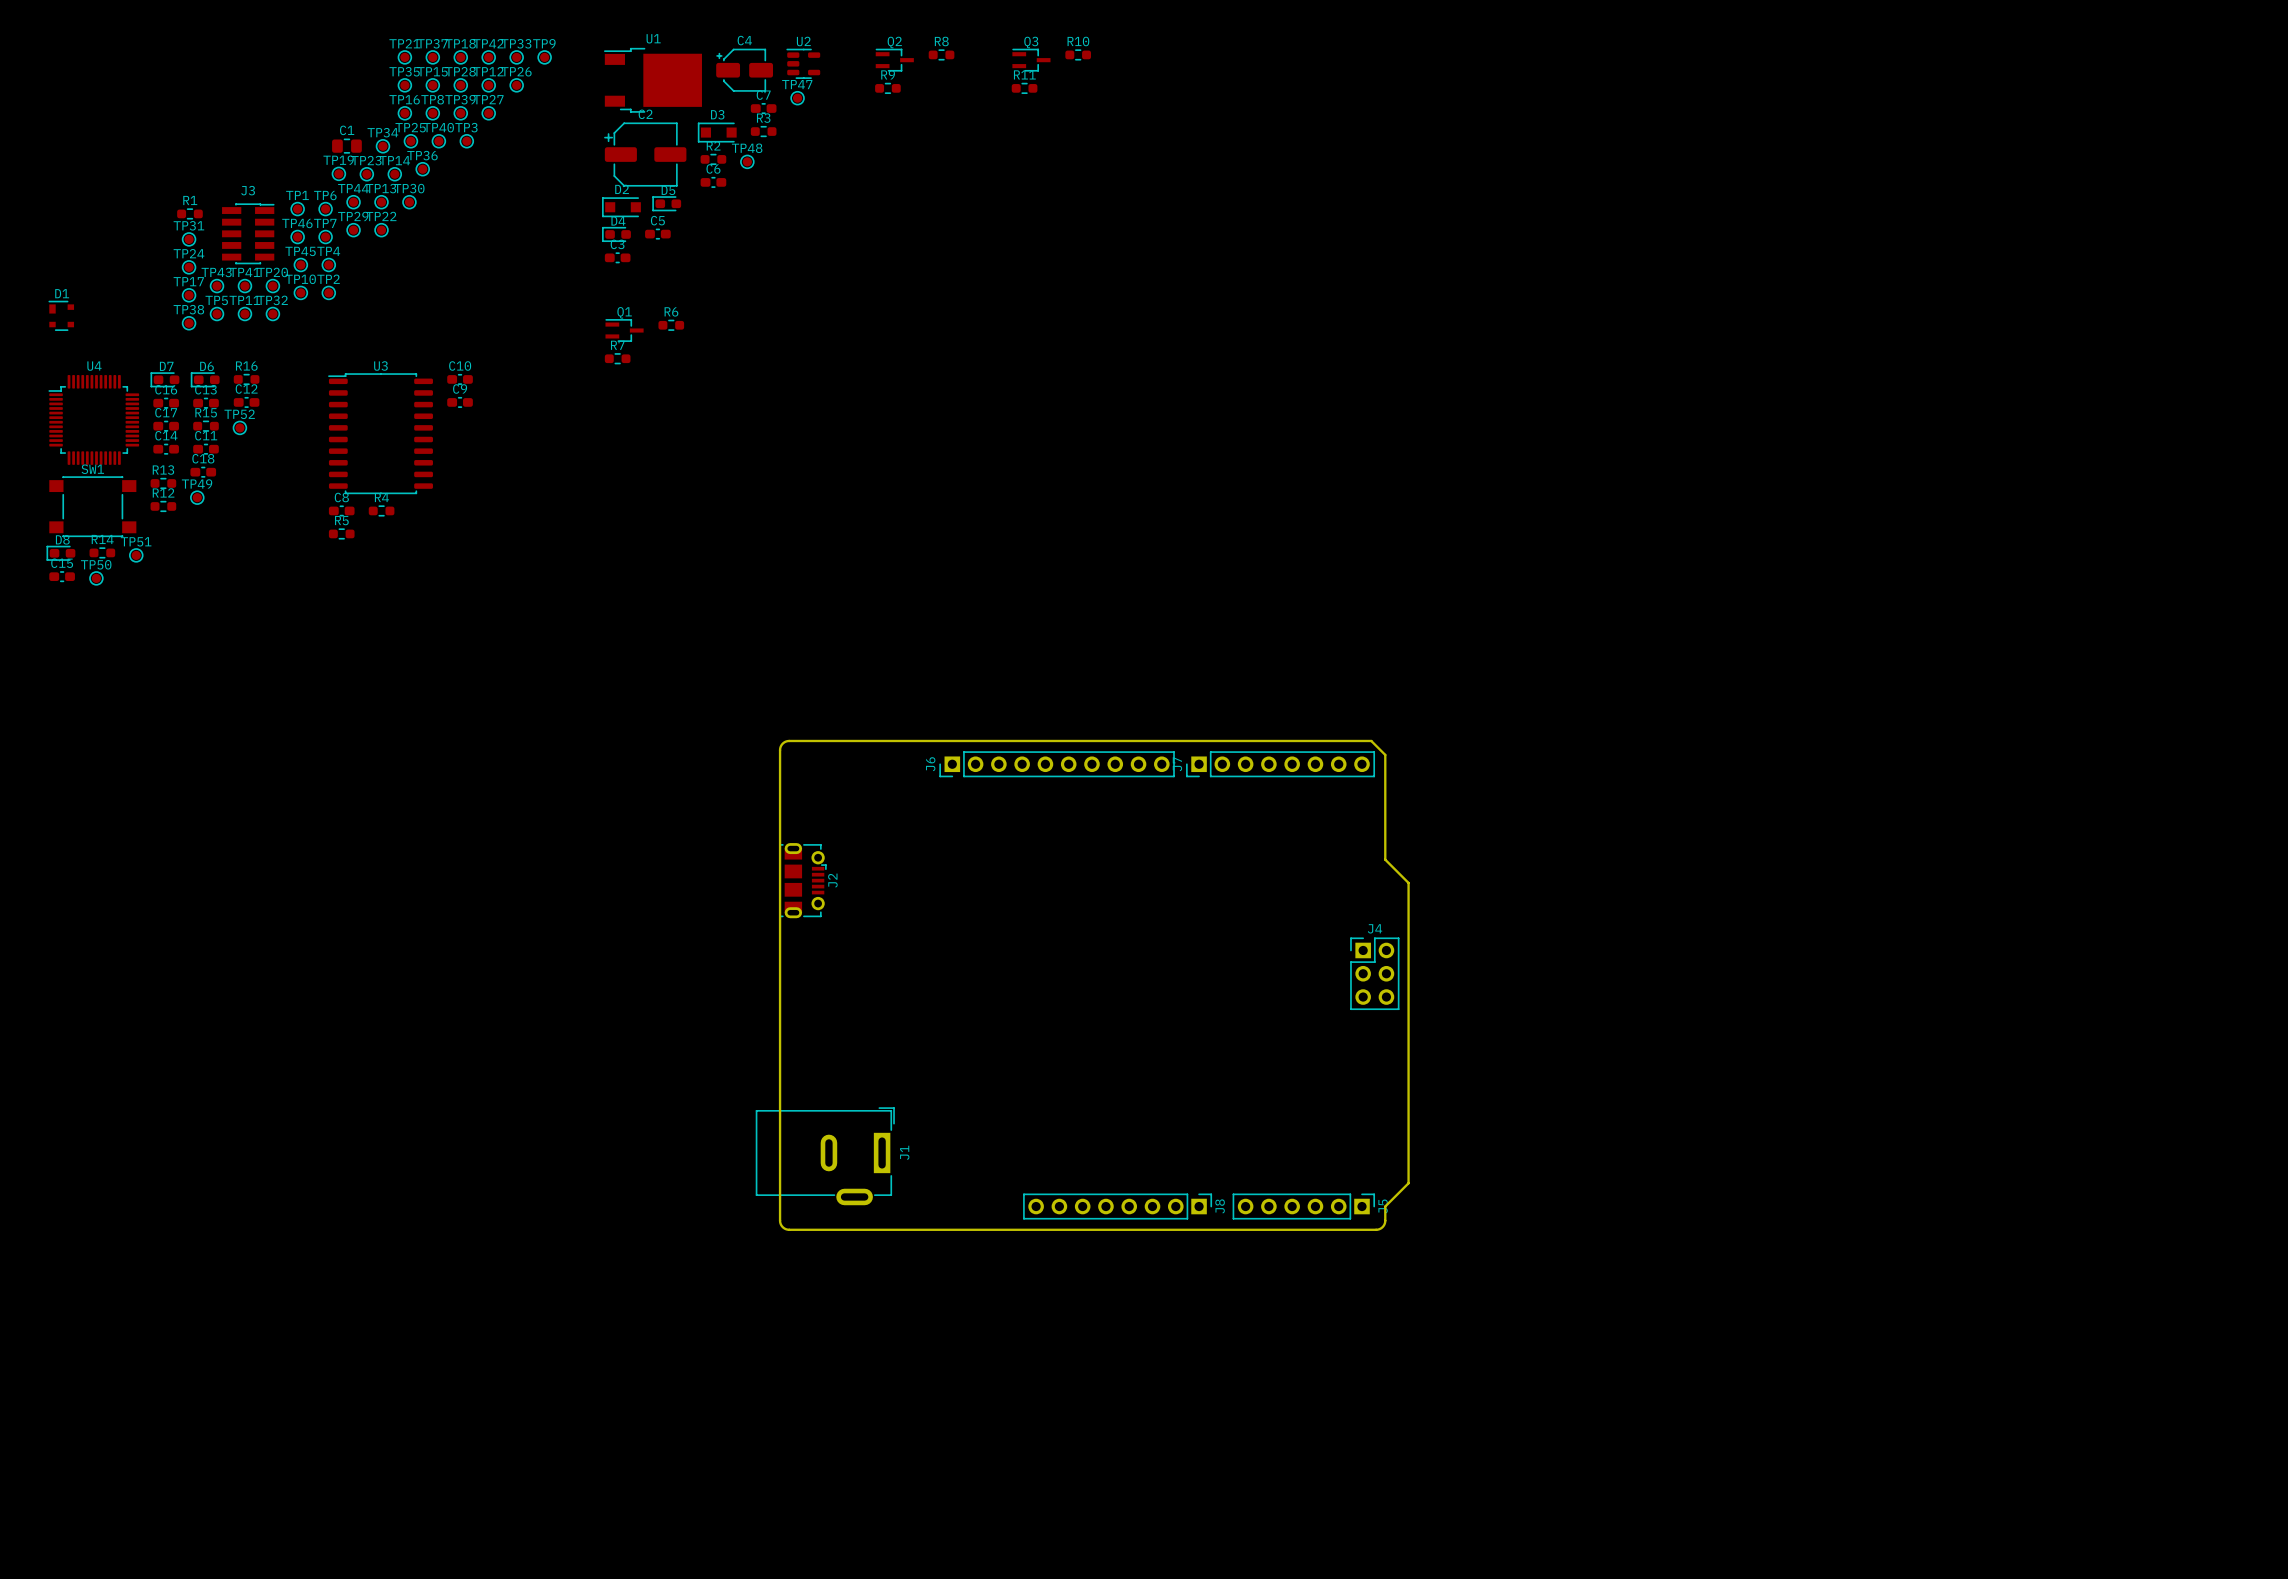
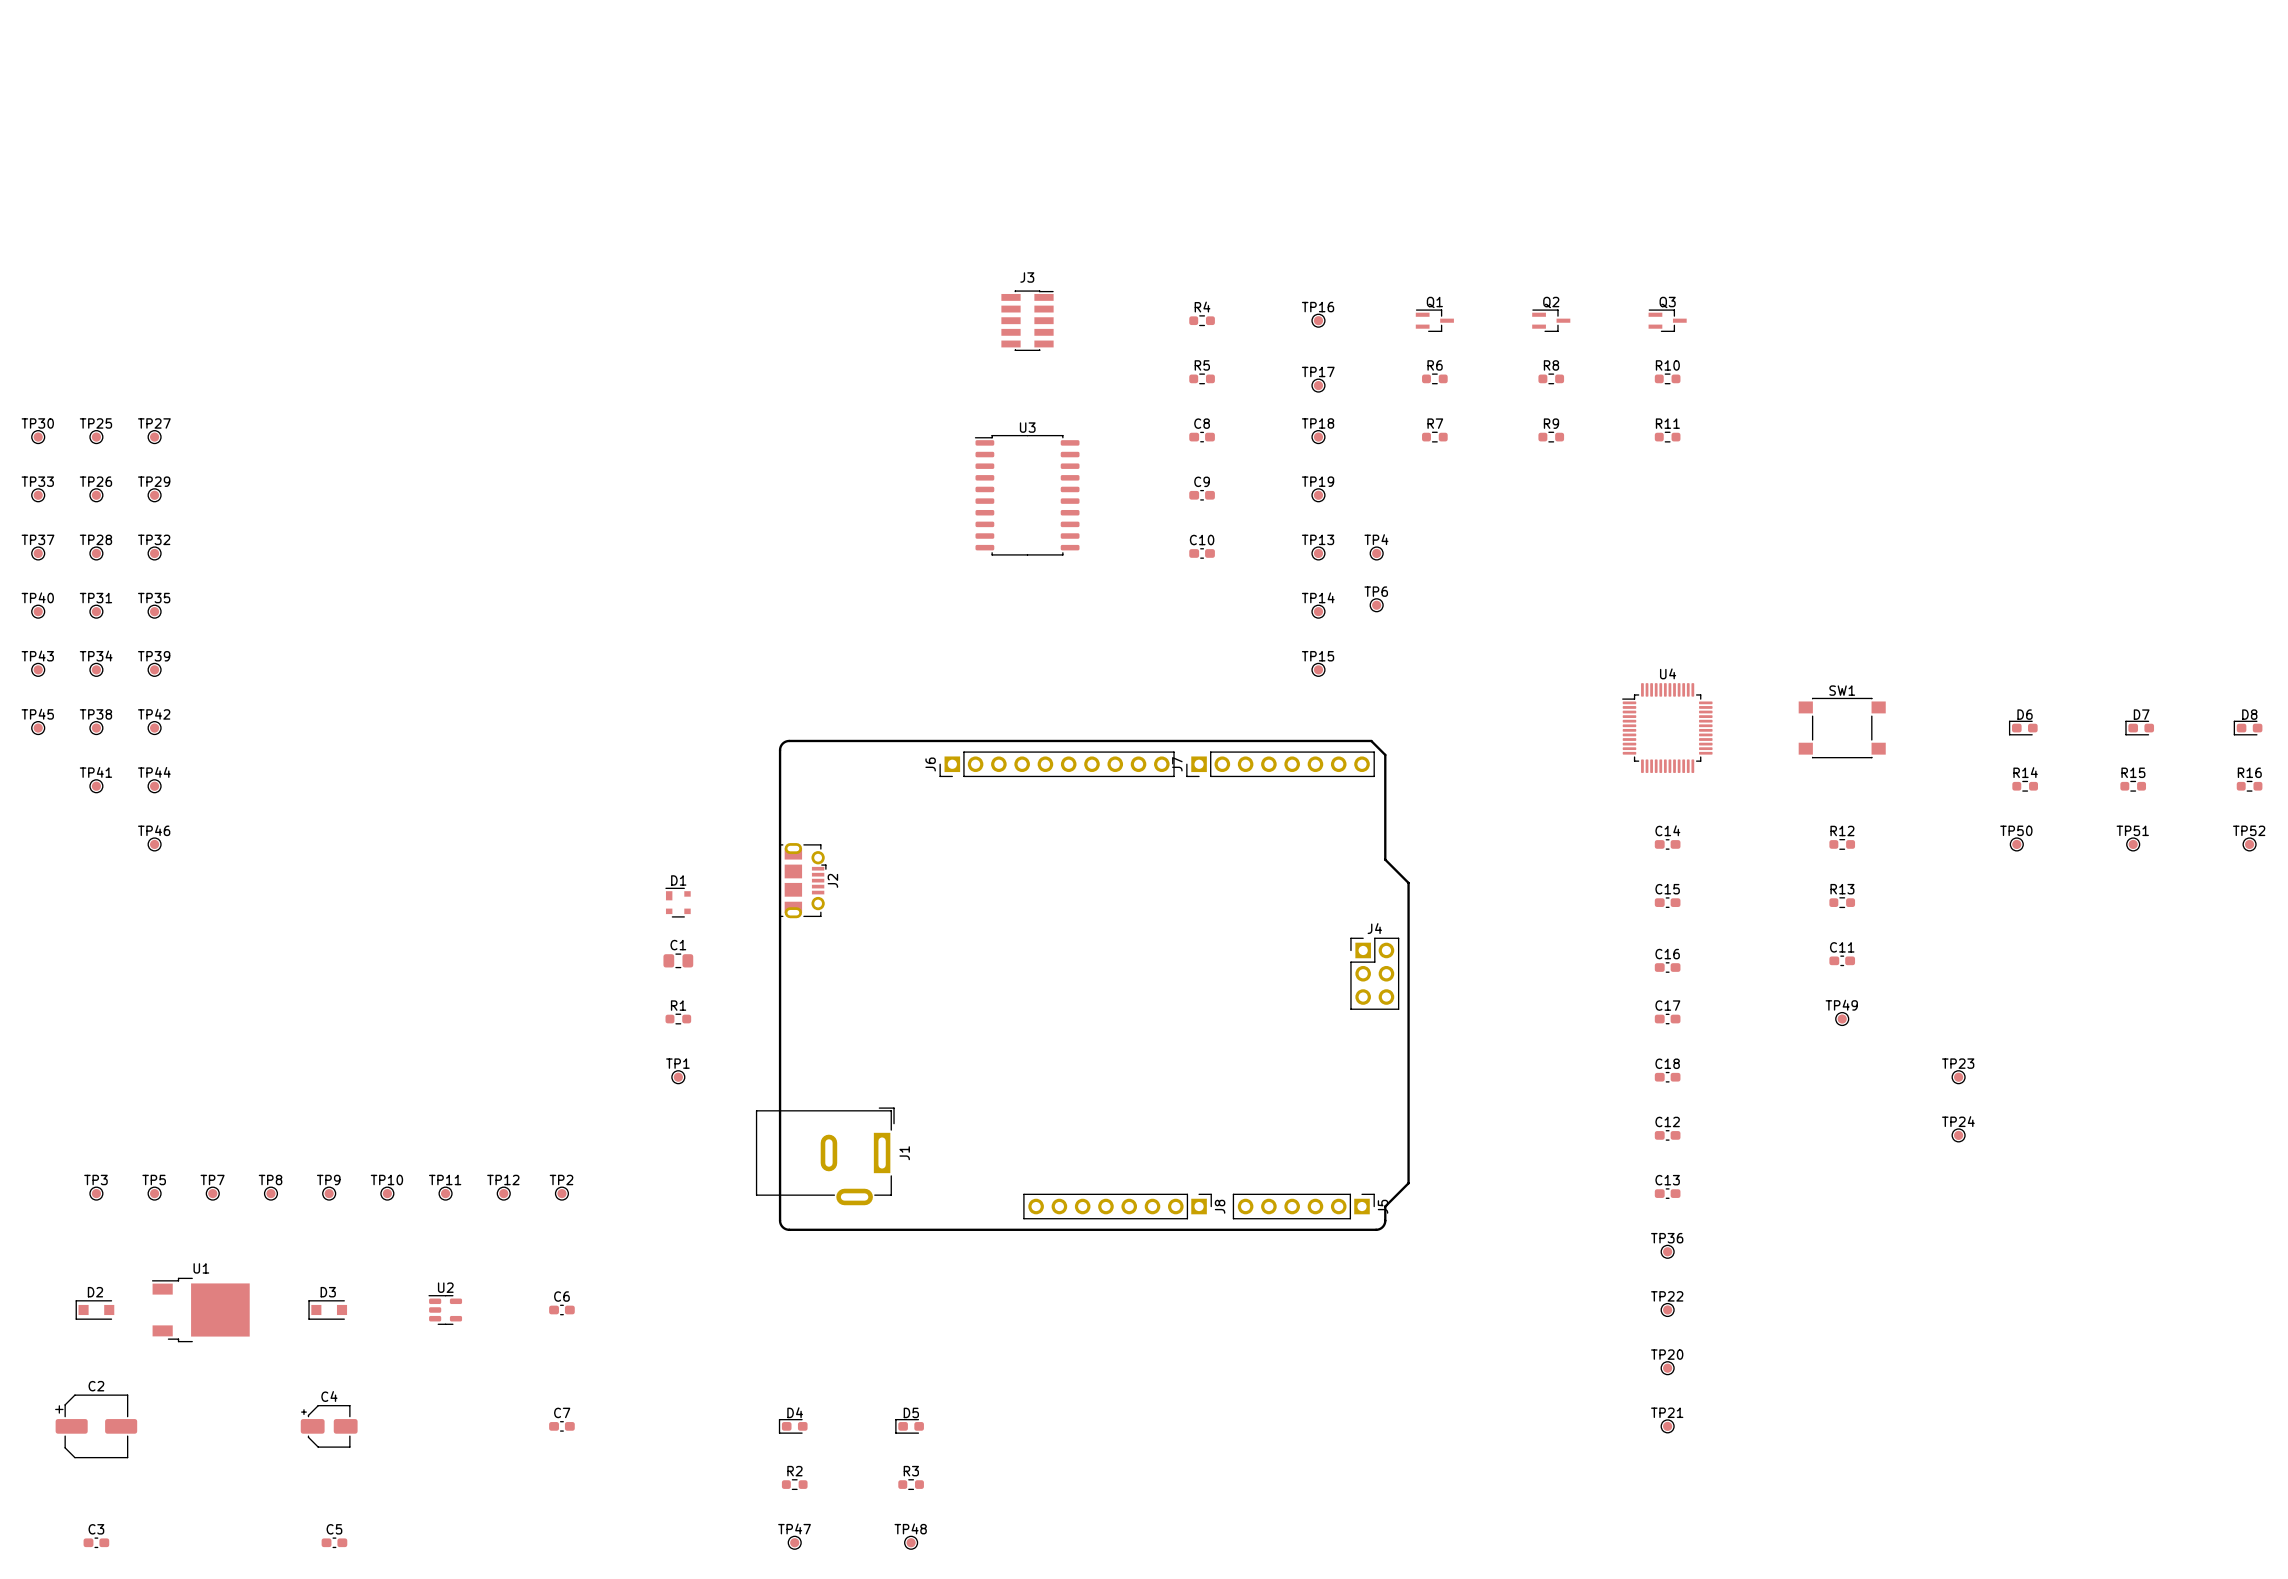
R8 position: (941, 54) -> (1551, 378)
R10 position: (1078, 54) -> (1667, 378)
TP21 position: (404, 57) -> (1667, 1426)
TP37 position: (432, 57) -> (38, 553)
TP18 position: (460, 57) -> (1318, 437)
TP42 position: (488, 57) -> (154, 728)
TP33 position: (516, 57) -> (38, 495)
TP9 position: (544, 57) -> (329, 1193)
Q2 position: (894, 60) -> (1551, 320)
Q3 position: (1031, 60) -> (1667, 320)
U2 position: (803, 63) -> (445, 1309)
C4 position: (744, 70) -> (329, 1426)
U1 position: (653, 80) -> (200, 1309)
TP35 position: (404, 85) -> (154, 611)
TP15 position: (432, 85) -> (1318, 669)
TP28 position: (460, 85) -> (96, 553)
TP12 position: (488, 85) -> (503, 1193)
TP26 position: (516, 85) -> (96, 495)
R9 position: (887, 88) -> (1551, 437)
R11 position: (1024, 88) -> (1667, 437)
TP47 position: (797, 98) -> (794, 1542)
C7 position: (763, 108) -> (561, 1426)
TP16 position: (404, 113) -> (1318, 320)
TP8 position: (432, 113) -> (270, 1193)
TP39 position: (460, 113) -> (154, 669)
TP27 position: (488, 113) -> (154, 437)
C2 footprint: [604, 122, 687, 187] -> [55, 1394, 138, 1459]
R3 position: (763, 131) -> (911, 1484)
D3 position: (717, 132) -> (327, 1309)
TP25 position: (410, 141) -> (96, 437)
TP40 position: (438, 141) -> (38, 611)
TP3 position: (466, 141) -> (96, 1193)
C1 position: (346, 146) -> (678, 960)
TP34 position: (382, 146) -> (96, 669)
R2 position: (713, 159) -> (794, 1484)
TP48 position: (747, 161) -> (911, 1542)
TP36 position: (422, 169) -> (1667, 1251)
TP19 position: (338, 173) -> (1318, 495)
TP23 position: (366, 174) -> (1958, 1077)
TP14 position: (394, 174) -> (1318, 611)
C6 position: (713, 182) -> (561, 1309)
TP44 position: (353, 202) -> (154, 786)
TP13 position: (381, 202) -> (1318, 553)
TP30 position: (409, 202) -> (38, 437)
D5 position: (666, 203) -> (909, 1426)
D2 position: (621, 207) -> (94, 1309)
TP1 position: (297, 209) -> (678, 1077)
TP6 position: (325, 209) -> (1376, 605)
R1 position: (189, 213) -> (678, 1019)
TP29 position: (353, 230) -> (154, 495)
TP22 position: (381, 230) -> (1667, 1309)
J3 position: (248, 233) -> (1027, 320)
D4 position: (616, 234) -> (793, 1426)
C5 position: (657, 234) -> (334, 1542)
TP46 position: (297, 237) -> (154, 844)
TP7 position: (325, 237) -> (212, 1193)
TP31 position: (189, 239) -> (96, 611)
C3 position: (617, 257) -> (96, 1542)
TP45 position: (300, 264) -> (38, 728)
TP4 position: (328, 264) -> (1376, 553)
TP24 position: (189, 267) -> (1958, 1135)
TP43 position: (217, 286) -> (38, 669)
TP41 position: (244, 286) -> (96, 786)
TP20 position: (272, 286) -> (1667, 1368)
TP10 position: (300, 292) -> (387, 1193)
TP2 position: (328, 292) -> (561, 1193)
TP17 position: (189, 295) -> (1318, 385)
TP5 position: (217, 314) -> (154, 1193)
TP11 position: (244, 314) -> (445, 1193)
TP32 position: (272, 314) -> (154, 553)
D1 position: (61, 315) -> (678, 902)
TP38 position: (189, 323) -> (96, 728)
R6 position: (671, 325) -> (1434, 378)
Q1 position: (624, 330) -> (1434, 320)
R7 position: (617, 358) -> (1434, 437)
D7 position: (165, 379) -> (2139, 728)
D6 position: (205, 379) -> (2023, 728)
R16 position: (246, 379) -> (2249, 786)
C10 position: (460, 379) -> (1202, 553)
C12 position: (246, 402) -> (1667, 1135)
C9 position: (460, 402) -> (1202, 495)
C16 position: (166, 403) -> (1667, 967)
C13 position: (206, 403) -> (1667, 1193)
U4 position: (93, 419) -> (1667, 728)
C17 position: (166, 426) -> (1667, 1019)
R15 position: (206, 426) -> (2133, 786)
TP52 position: (239, 427) -> (2249, 844)
U3 position: (380, 433) -> (1027, 495)
C14 position: (166, 449) -> (1667, 844)
C11 position: (206, 449) -> (1842, 960)
C18 position: (203, 472) -> (1667, 1077)
R13 position: (163, 483) -> (1842, 902)
TP49 position: (197, 497) -> (1842, 1019)
SW1 position: (92, 506) -> (1842, 728)
R12 position: (163, 506) -> (1842, 844)
C8 position: (341, 510) -> (1202, 437)
R4 position: (381, 510) -> (1202, 320)
R5 position: (341, 533) -> (1202, 378)
R14 position: (102, 552) -> (2025, 786)
D8 position: (61, 553) -> (2248, 728)
TP51 position: (136, 555) -> (2133, 844)
C15 position: (62, 576) -> (1667, 902)
TP50 position: (96, 578) -> (2016, 844)

